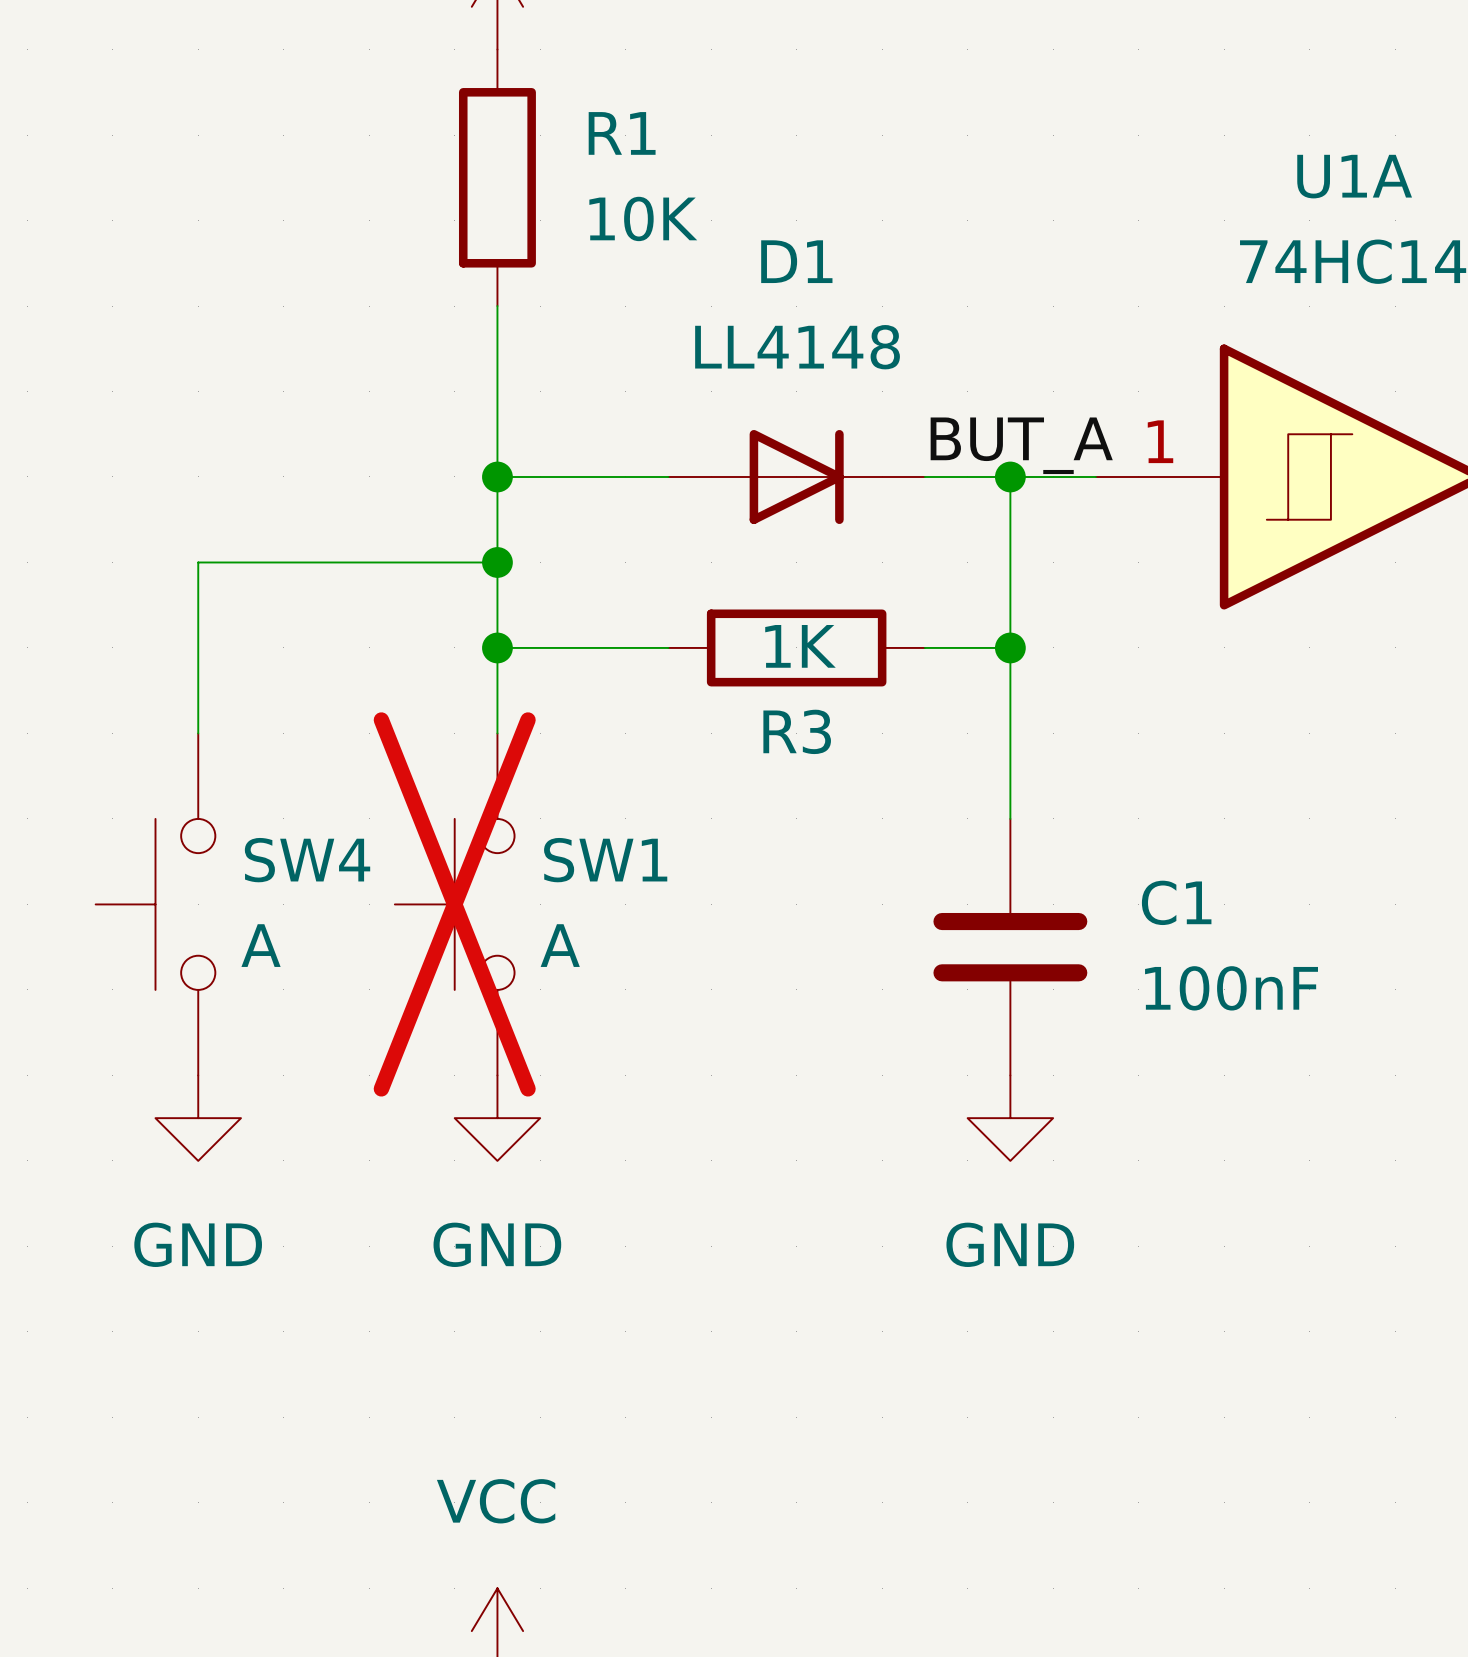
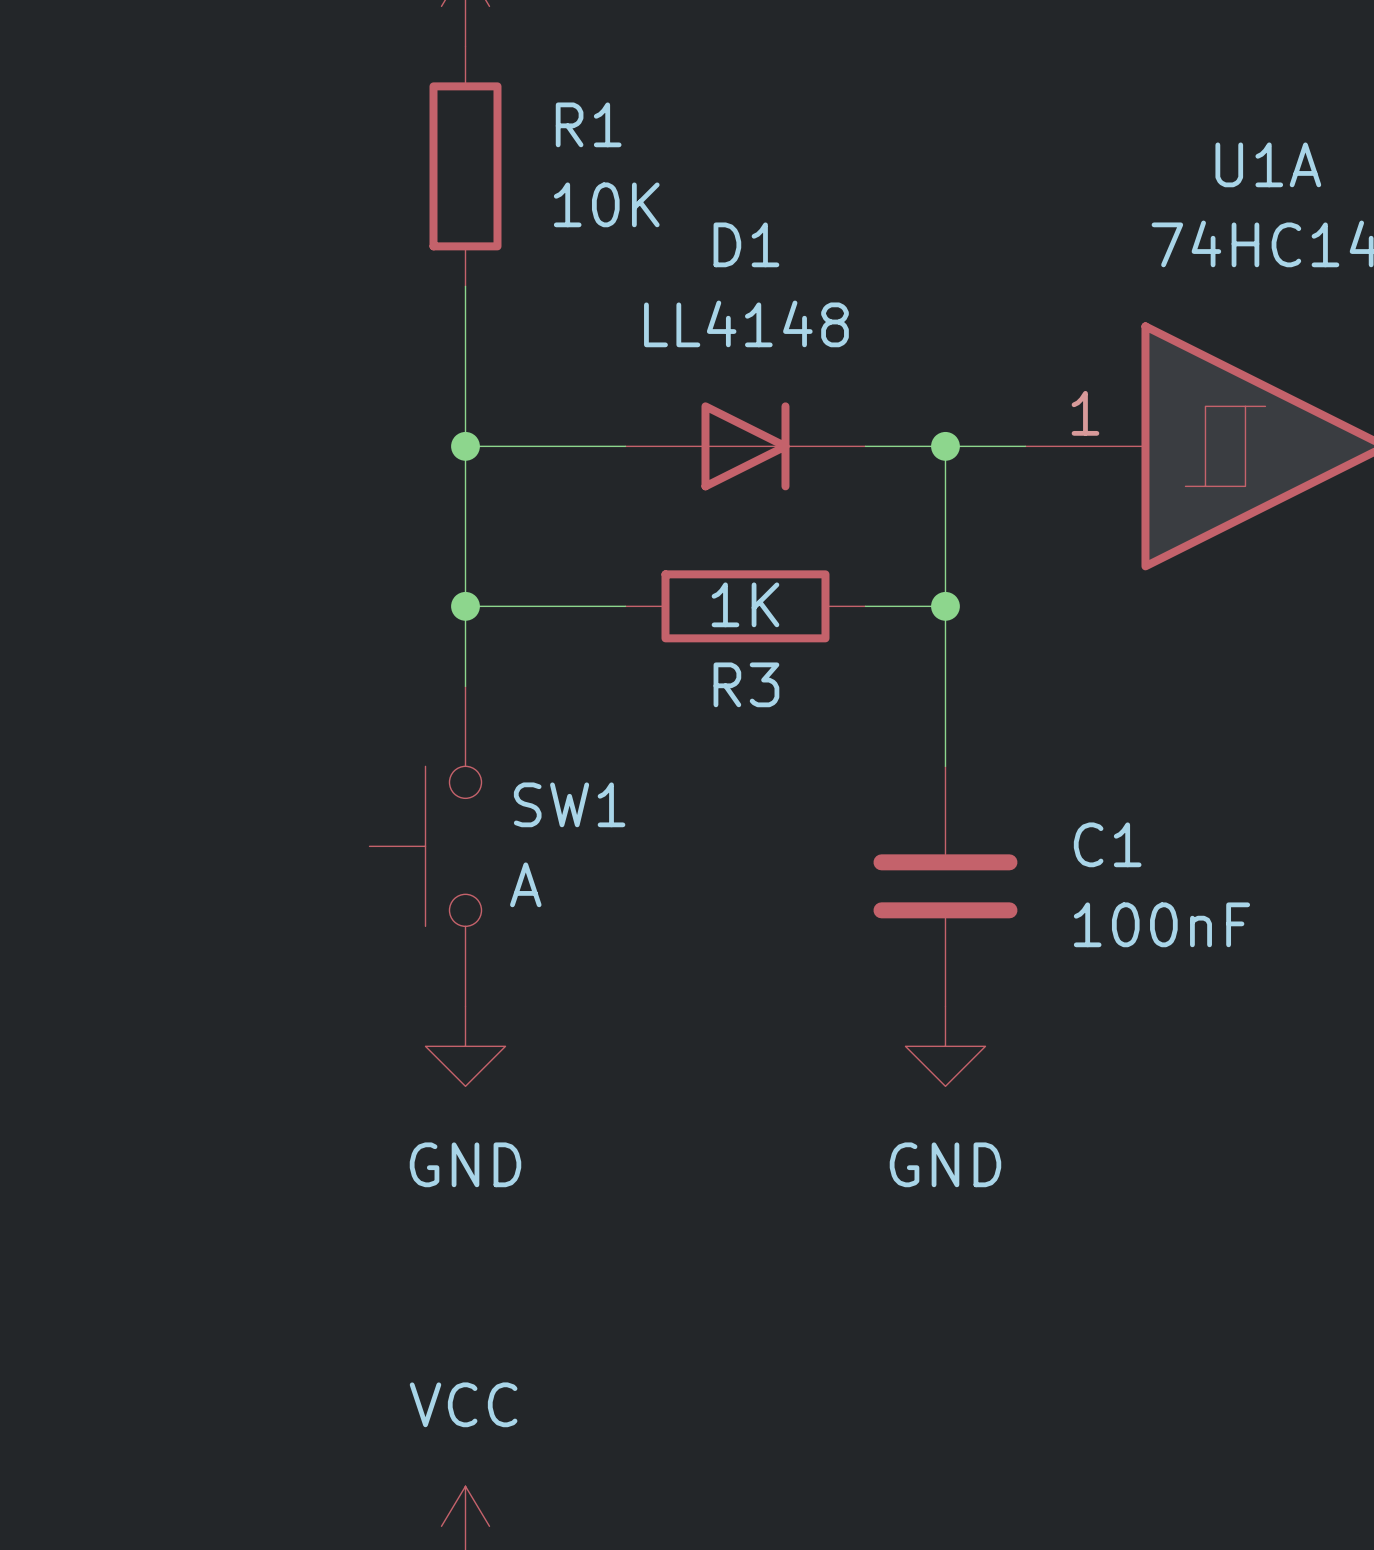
label: BUT_A (1021, 445) -> none
wire: (497, 562) (198, 562) (198, 733) -> none
junction: (497, 562) -> none
SW4: A (155, 904) -> none
SW1 do-not-place cross: (454, 904) -> none
power symbol: GND (198, 1118) -> none

